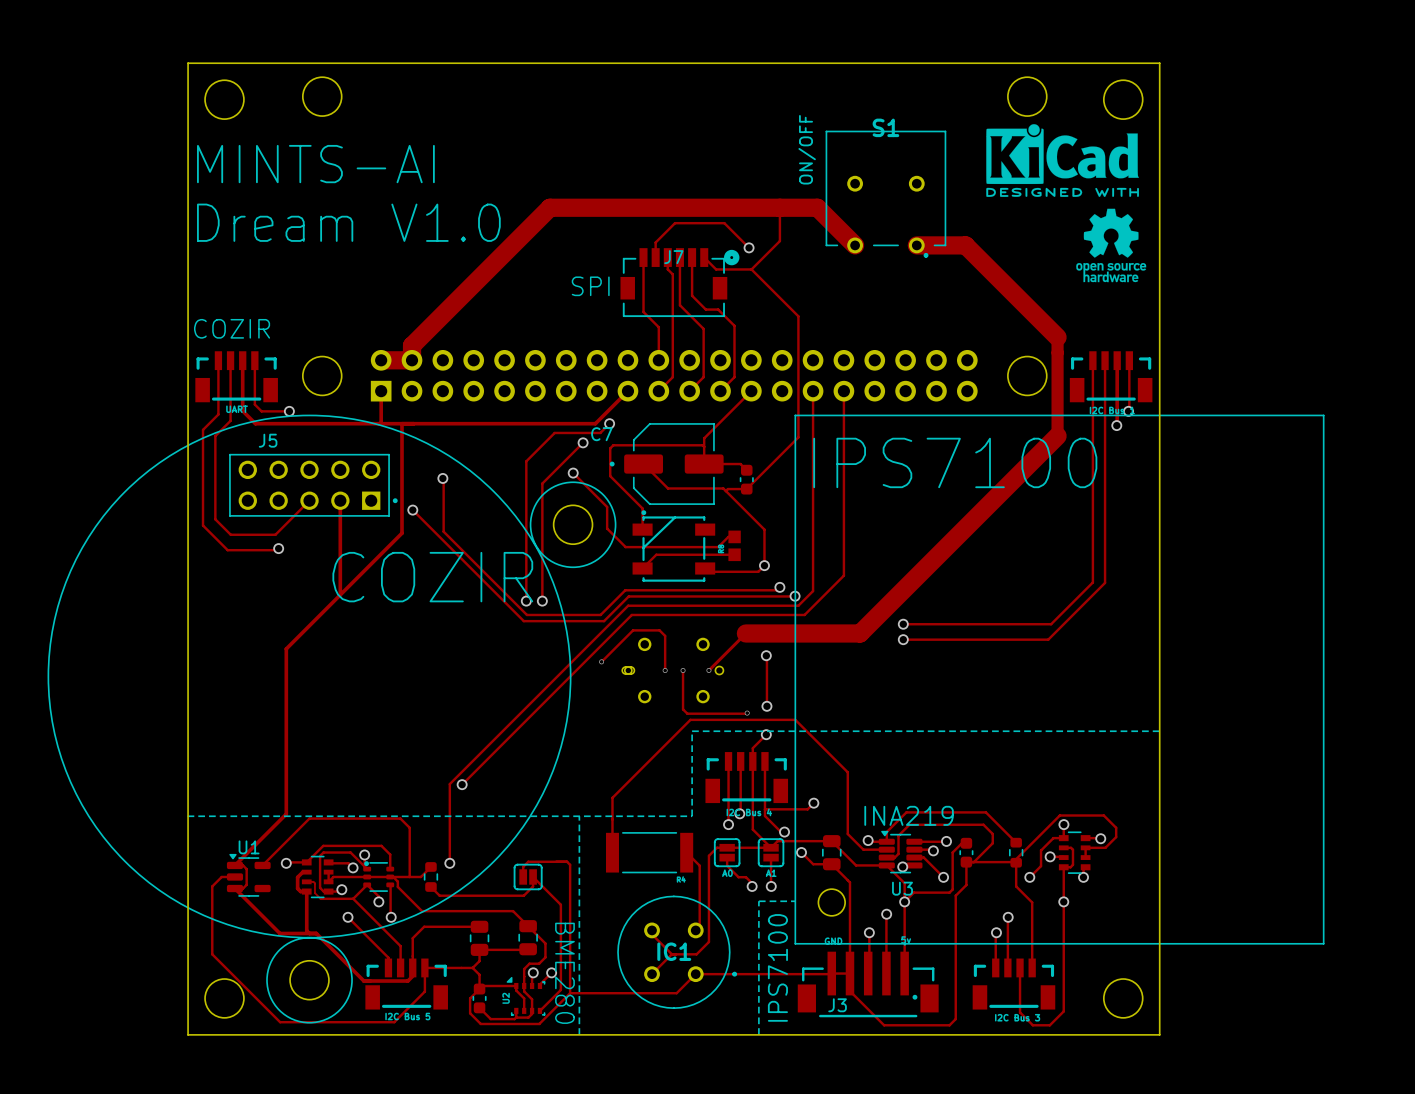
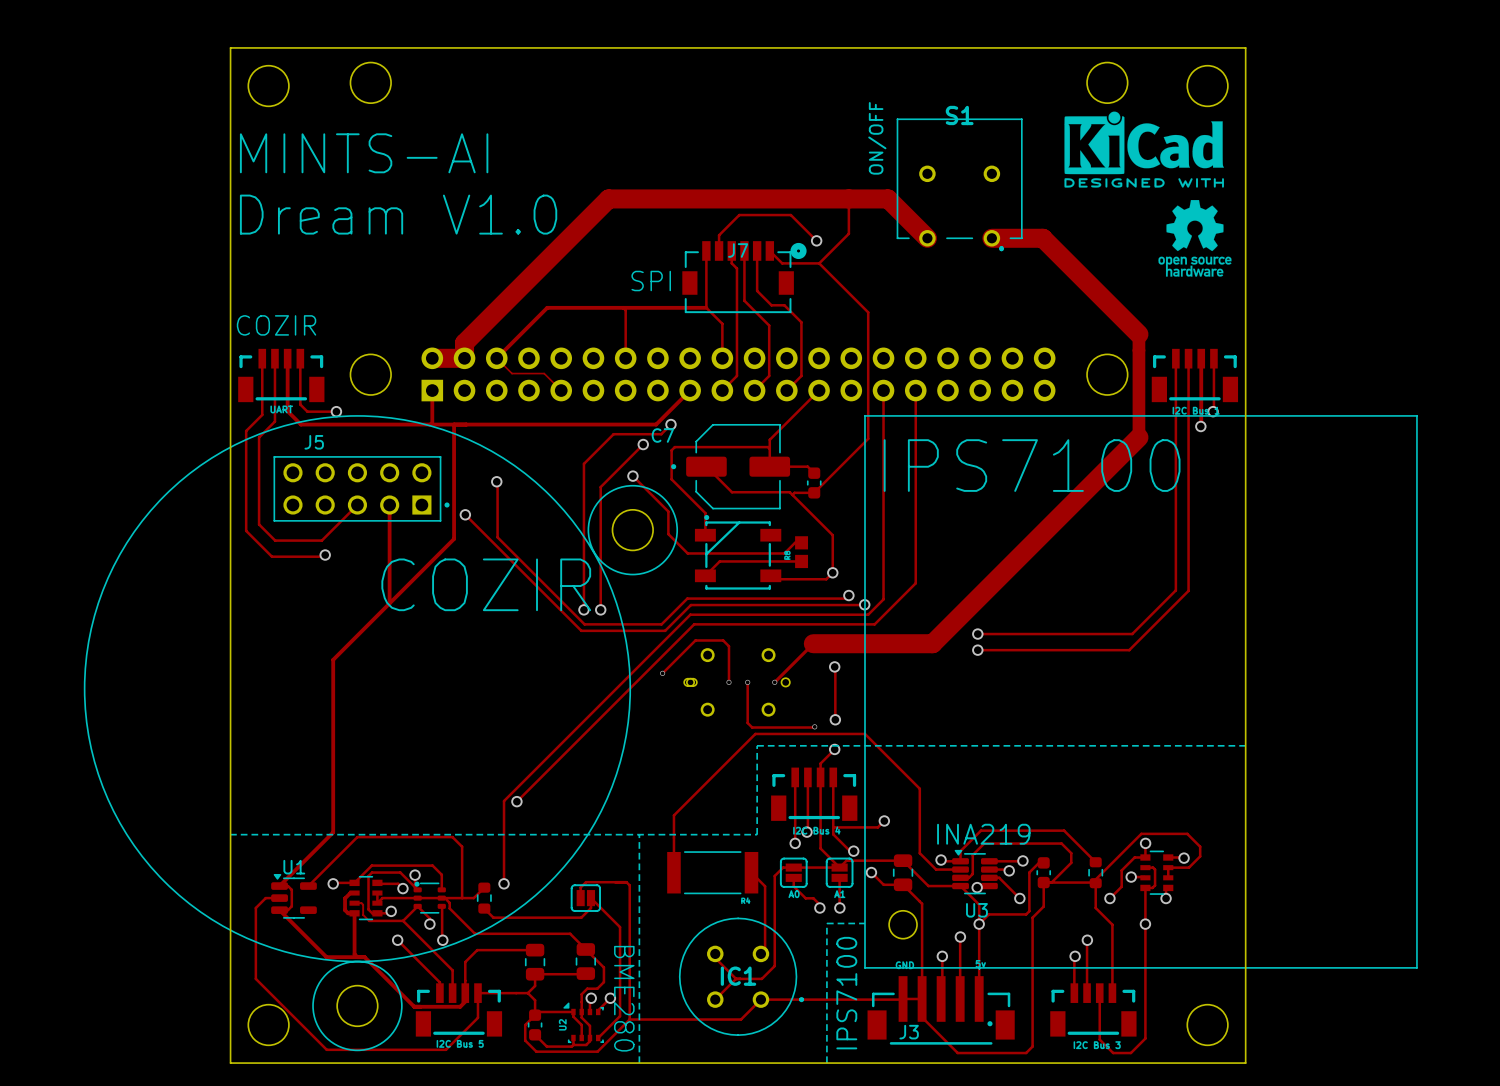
track: none -> (623, 307) (625, 310) (625, 358)
track: none -> (706, 307) (547, 307) (496, 358) (512, 373) (544, 373) (561, 390)

